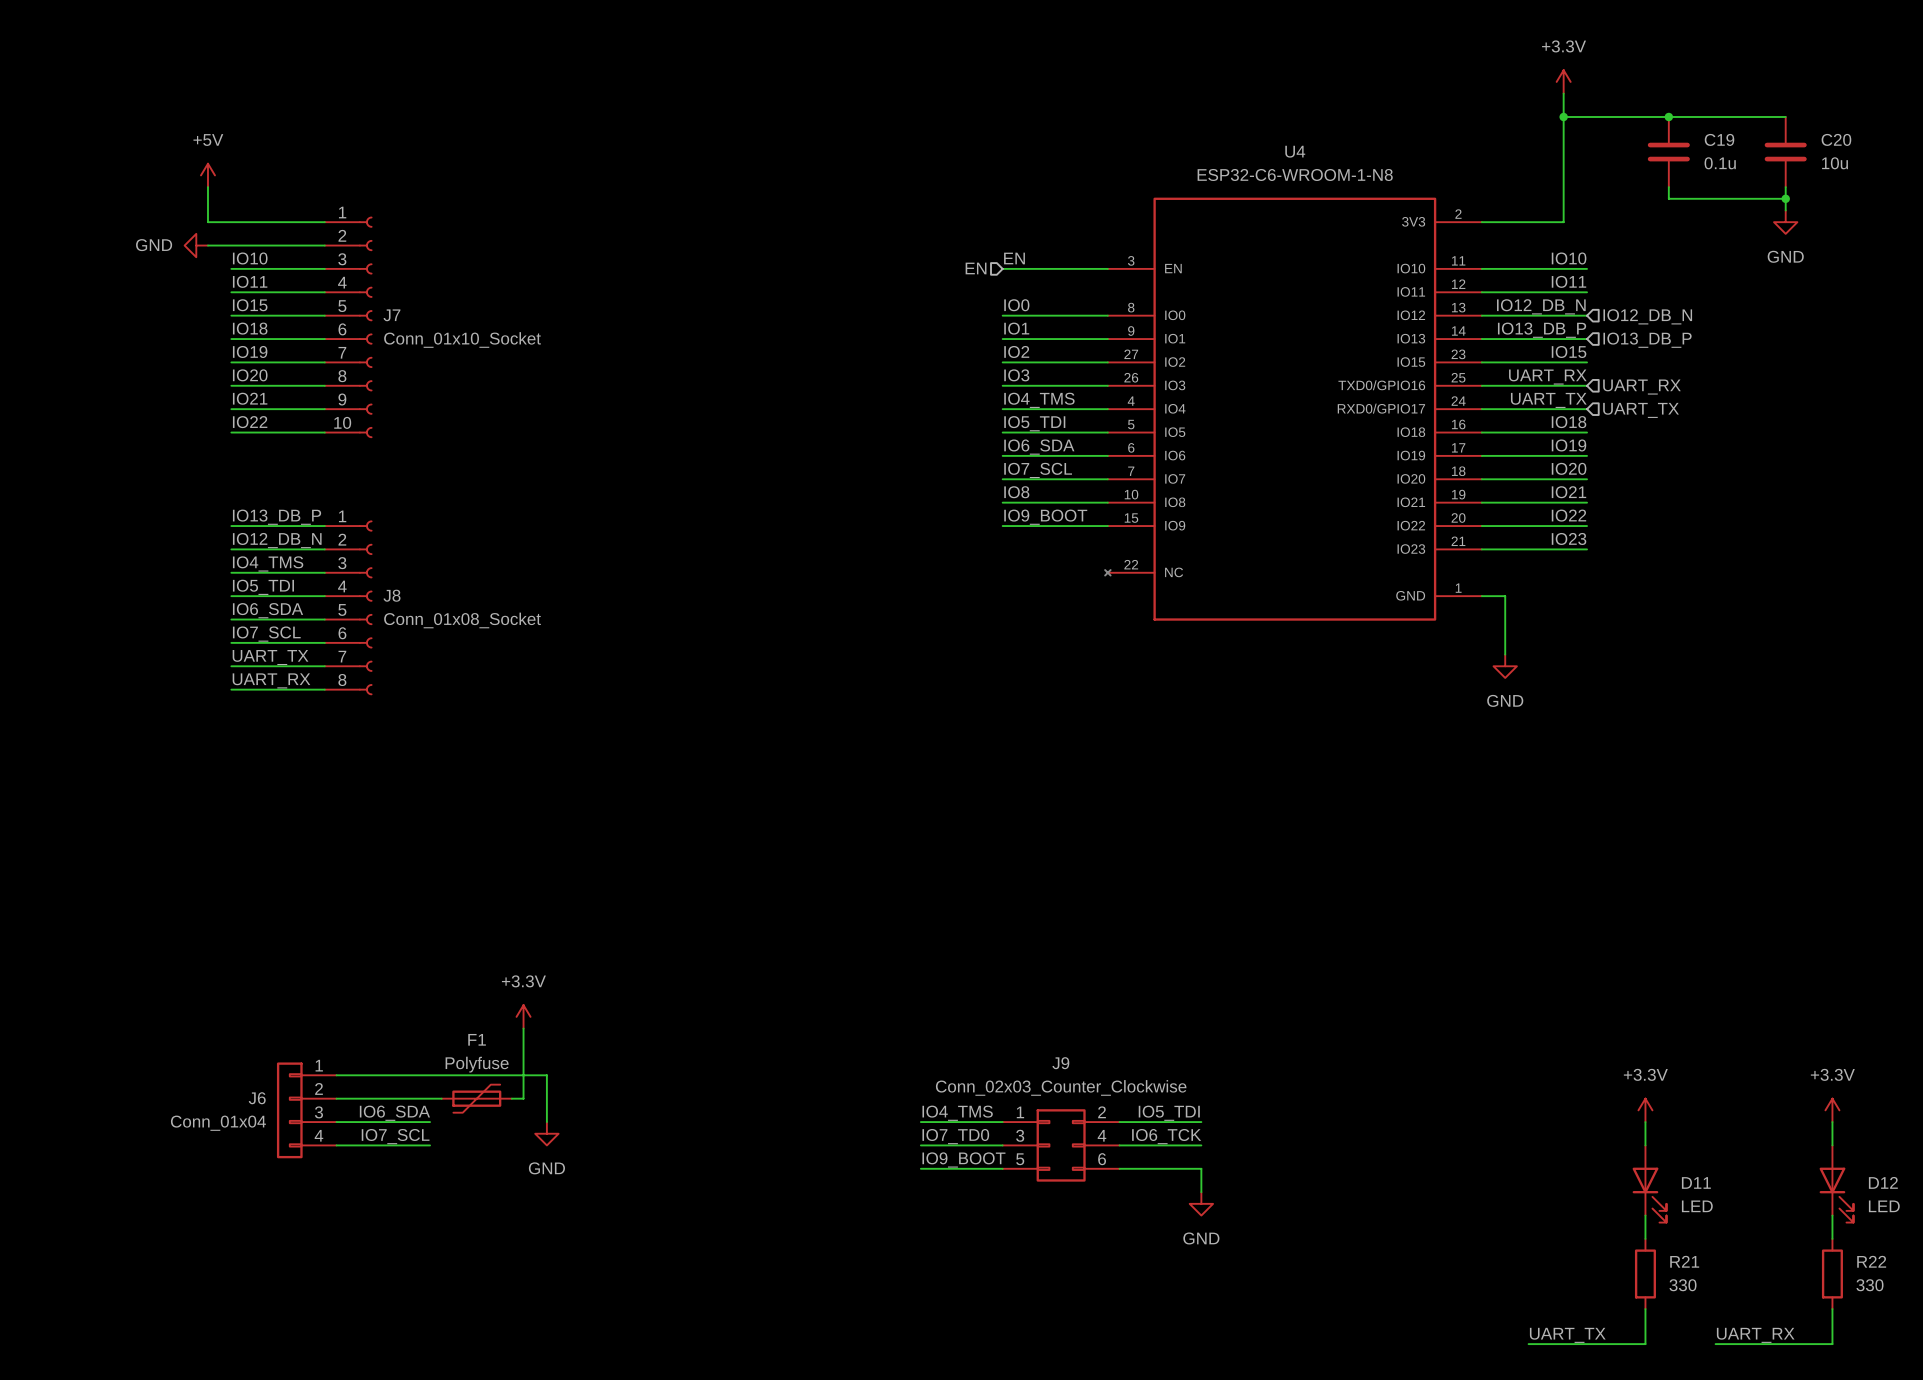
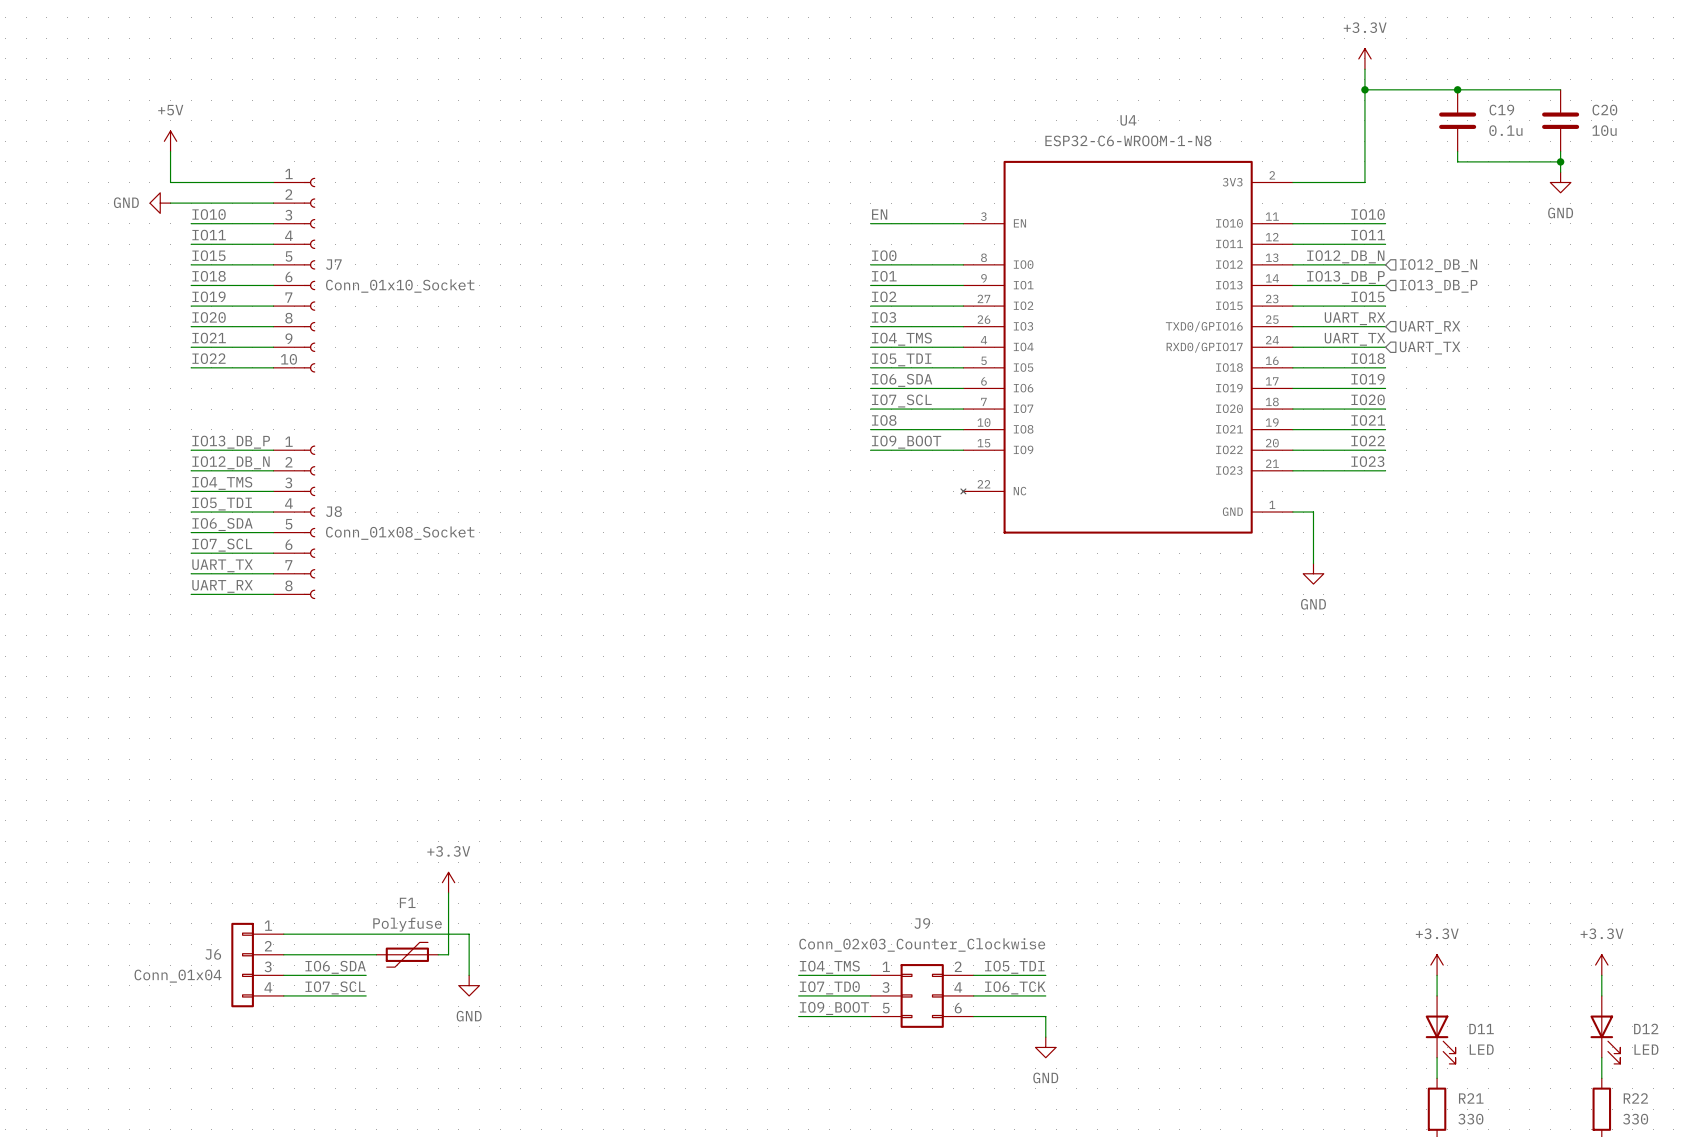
hierarchical label: EN (976, 268) -> none

